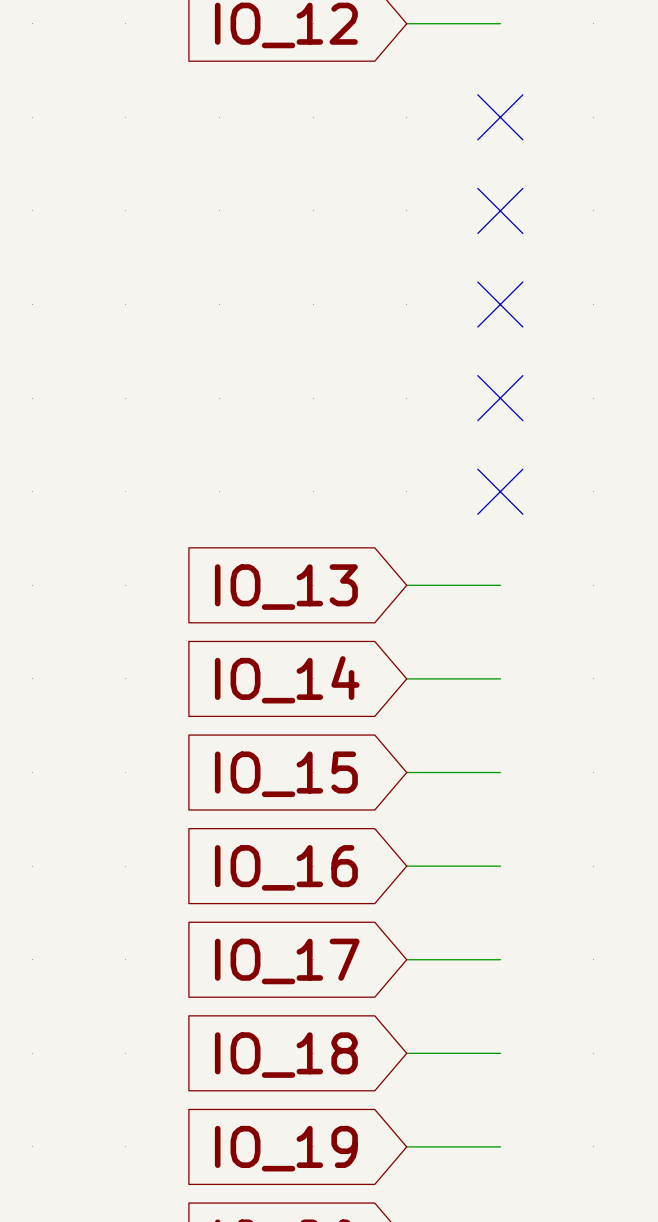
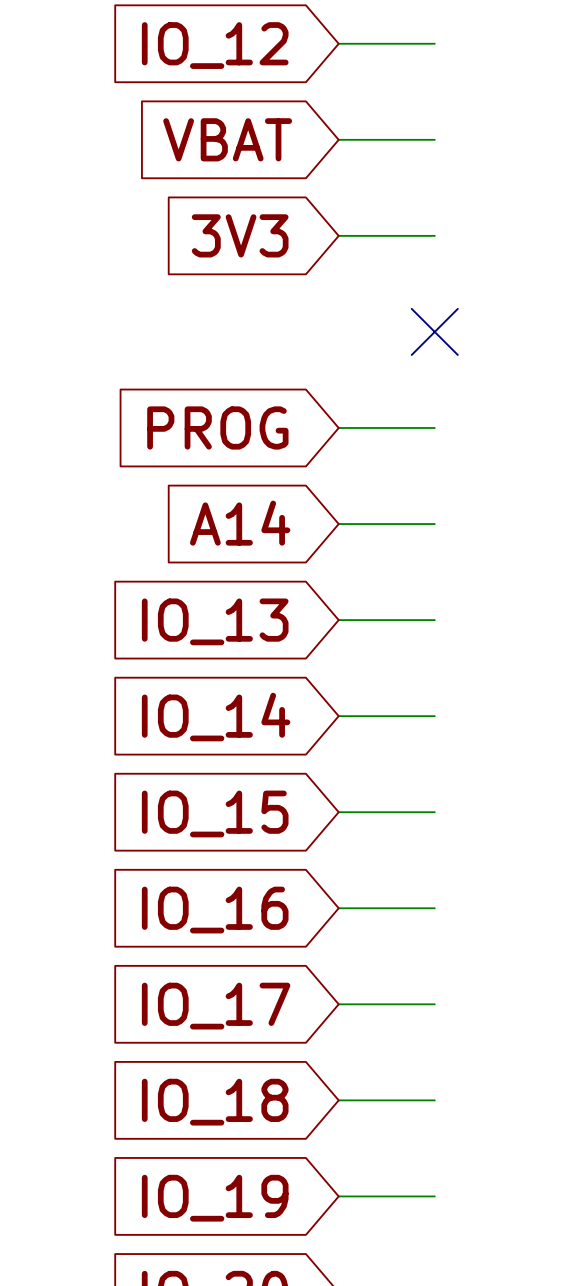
global label: none -> VBAT (227, 139)
wire: none -> (338, 139) (434, 139)
no-connect mark: (500, 117) -> none
global label: none -> 3V3 (240, 235)
wire: none -> (338, 235) (434, 235)
no-connect mark: (500, 210) -> none
global label: none -> PROG (217, 427)
wire: none -> (338, 427) (434, 427)
no-connect mark: (500, 398) -> none
global label: none -> A14 (240, 523)
wire: none -> (338, 524) (434, 524)
no-connect mark: (500, 491) -> none

